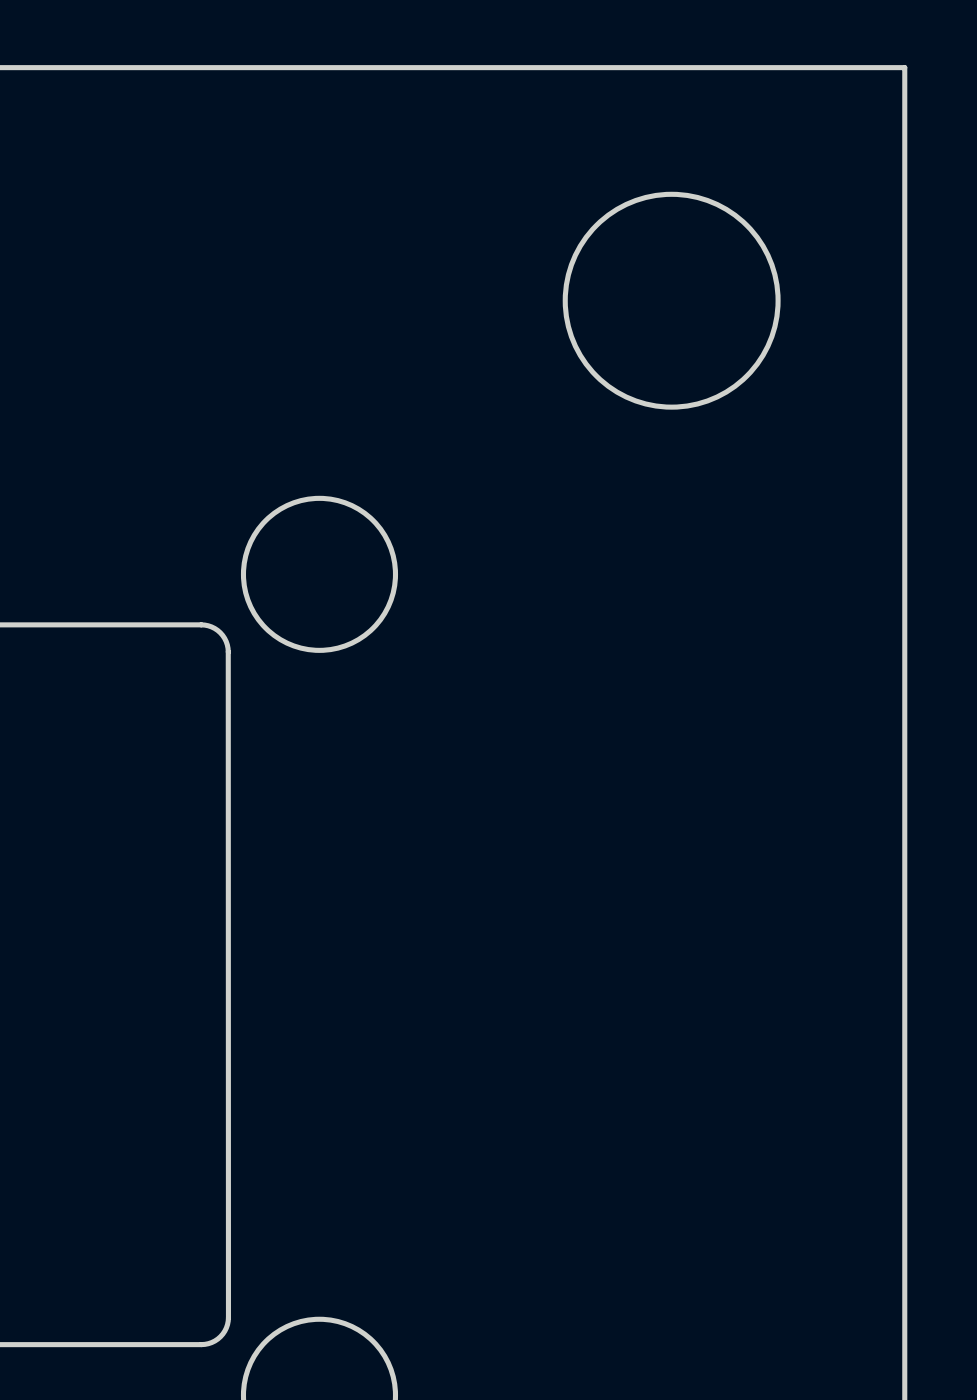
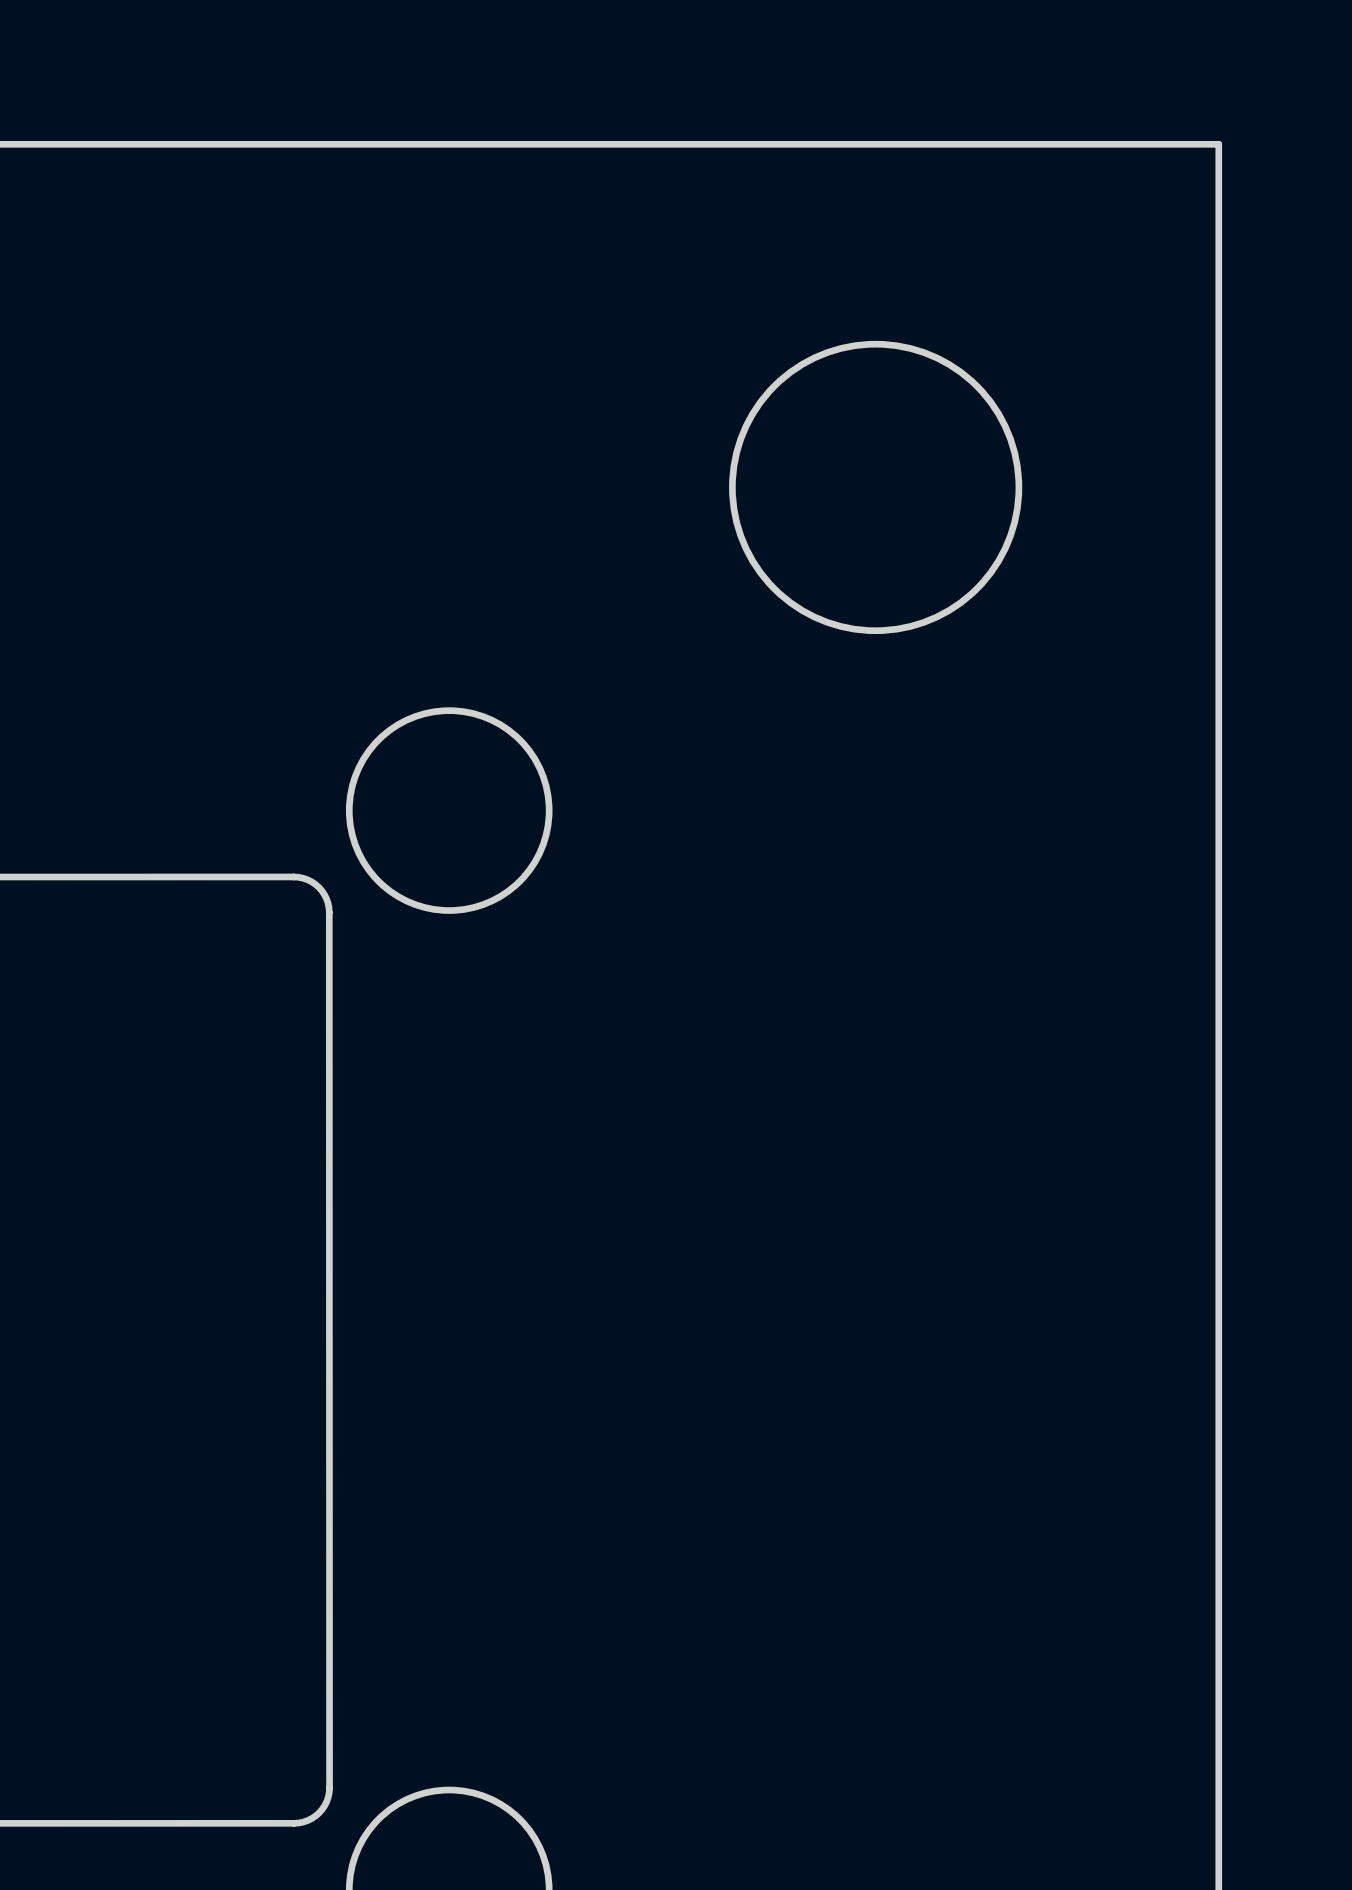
round board edge position: (671, 300) -> (875, 487)

